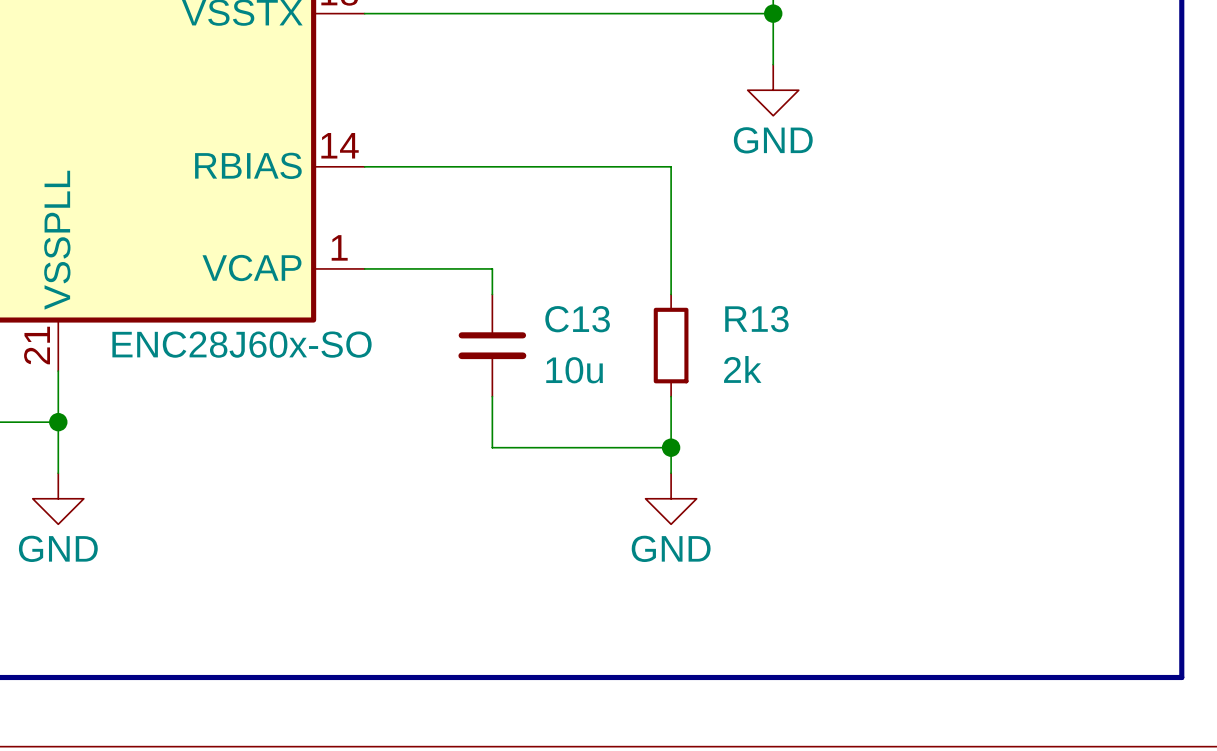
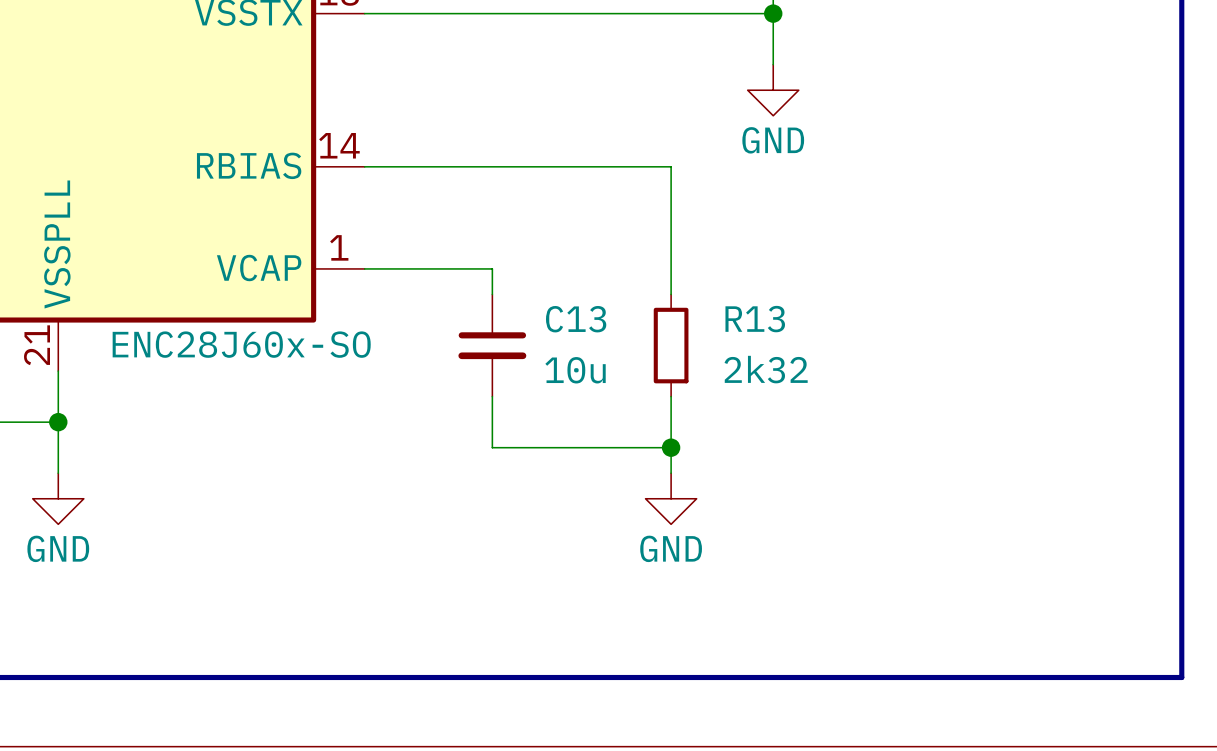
R13 value: 2k (742, 369) -> 2k32 (766, 369)

